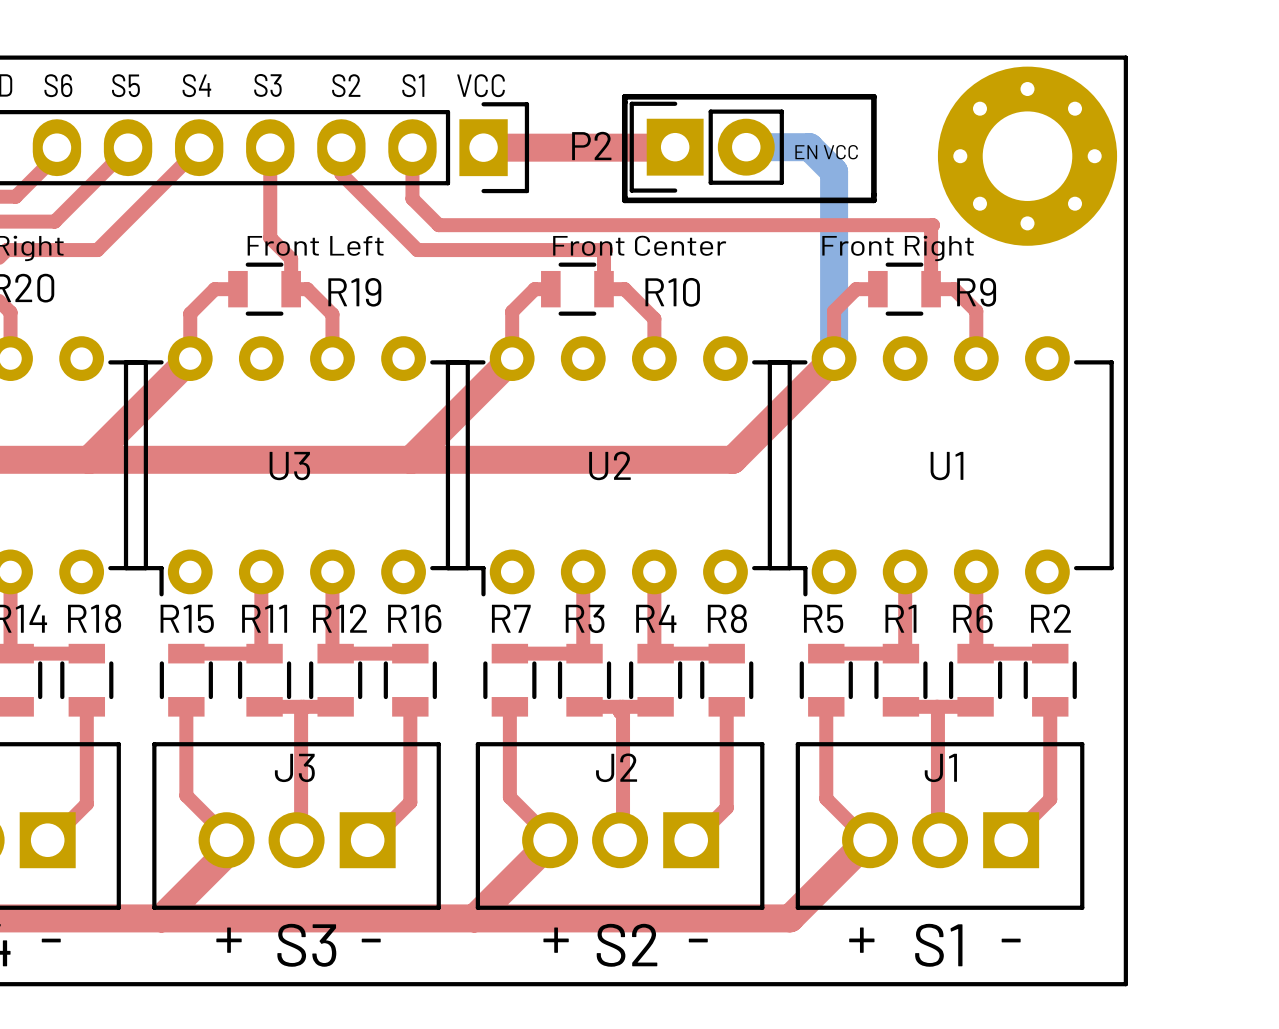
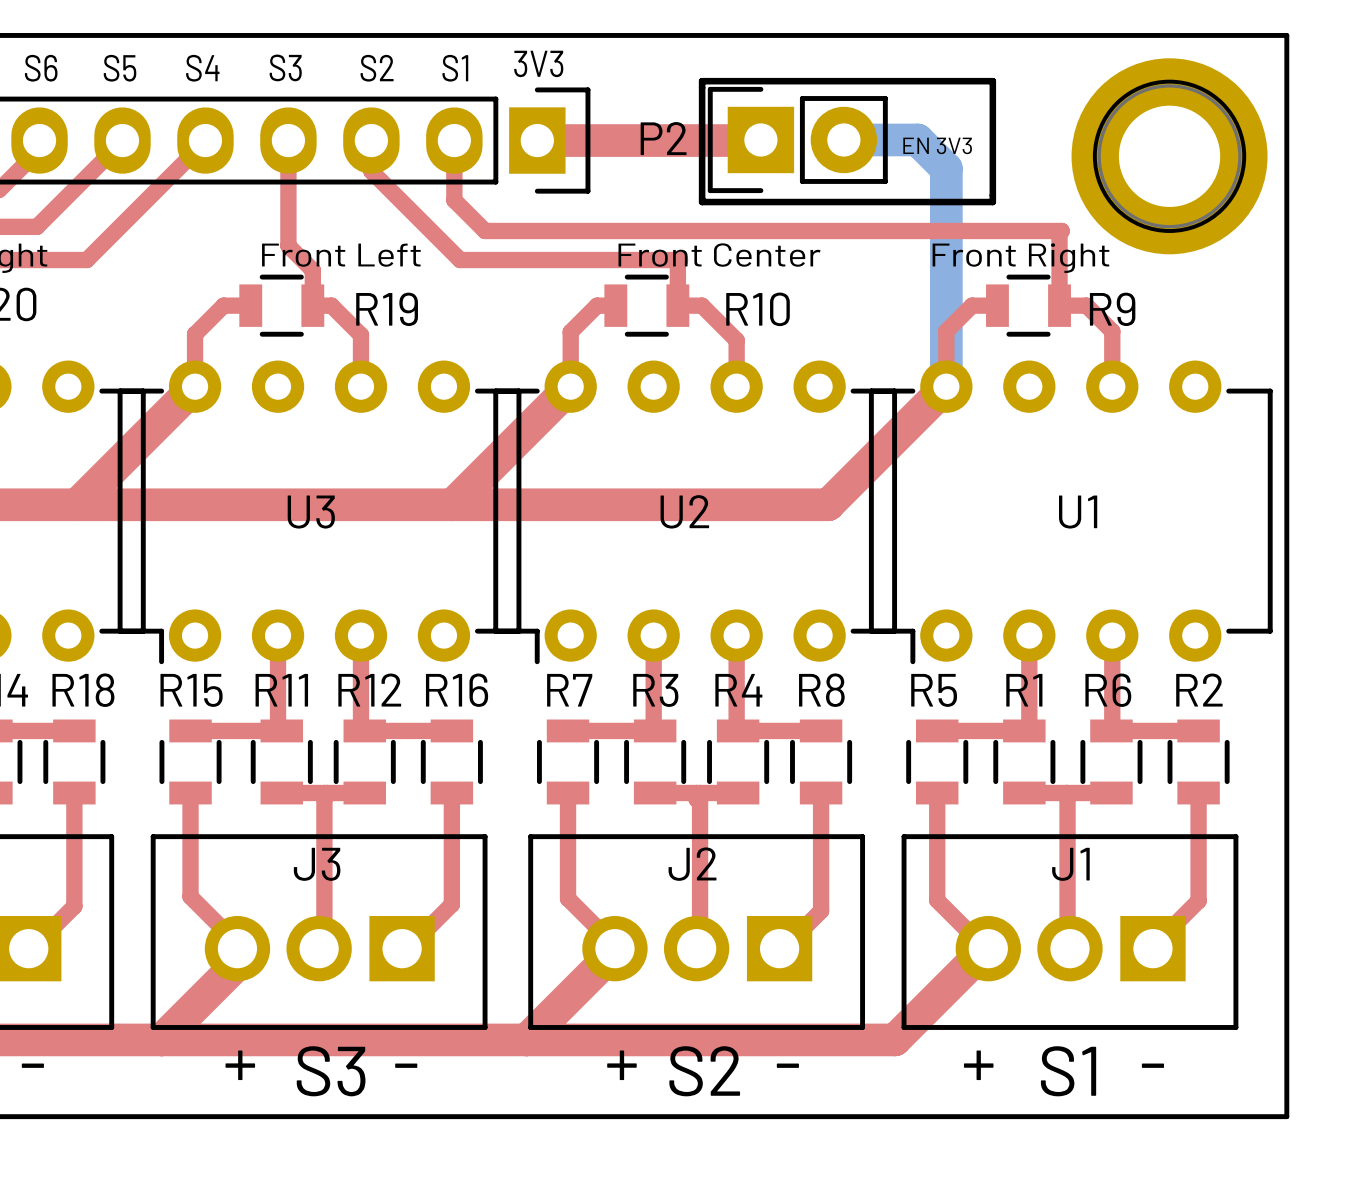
part footprint: [937, 66, 1118, 246] -> [1071, 58, 1268, 255]
text: VCC (481, 85) -> 3V3 (538, 63)
text: EN VCC (826, 152) -> EN 3V3 (937, 145)

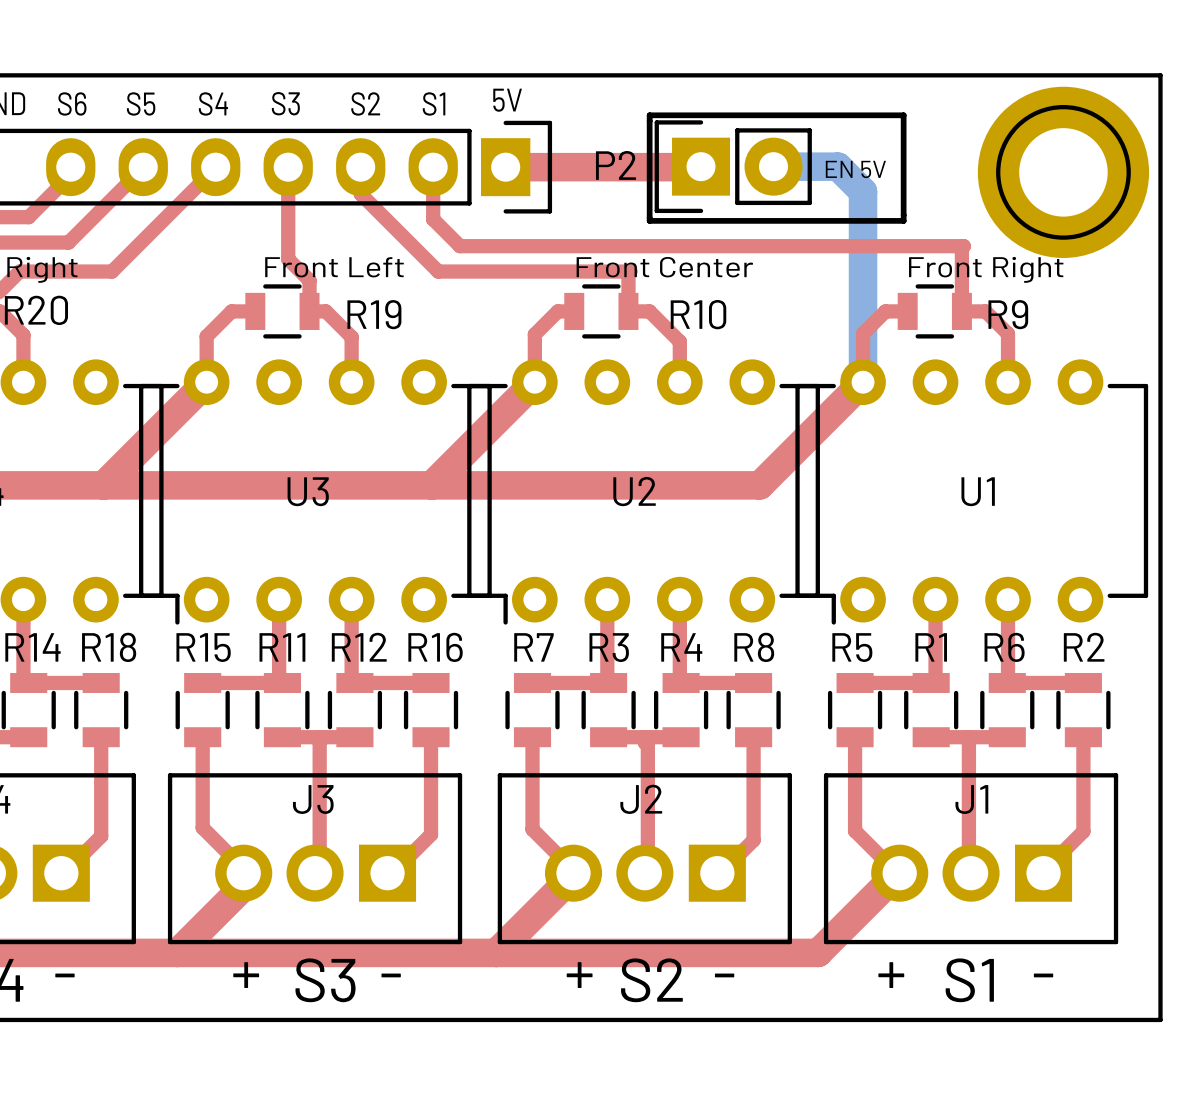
part footprint: [1071, 58, 1268, 255] -> [977, 86, 1150, 258]
text: 3V3 (538, 63) -> 5V (507, 100)
text: EN 3V3 (937, 145) -> EN 5V (855, 169)
text position: Front Right (1020, 258) -> Front Right (986, 269)

